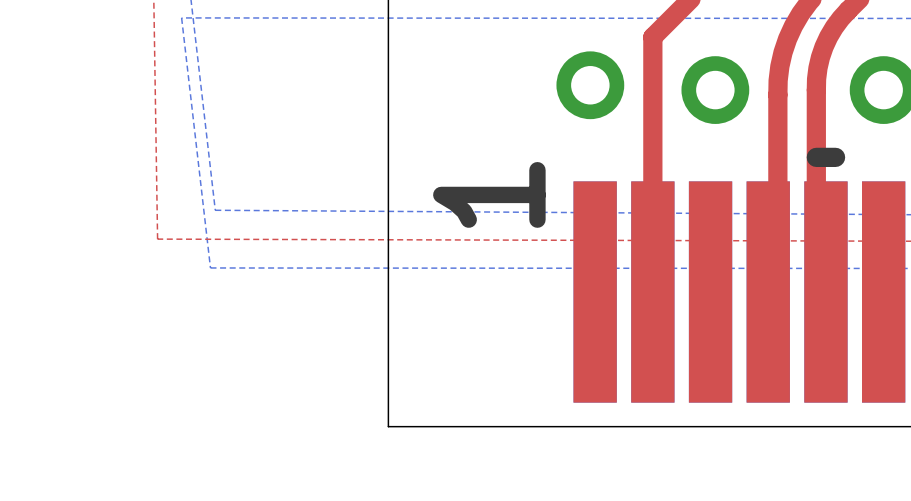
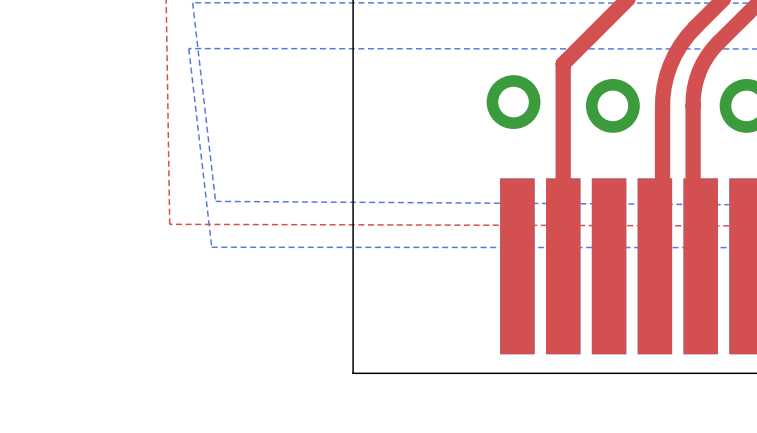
line: (816, 157) (835, 157) -> none
text: 1 (489, 194) -> none

